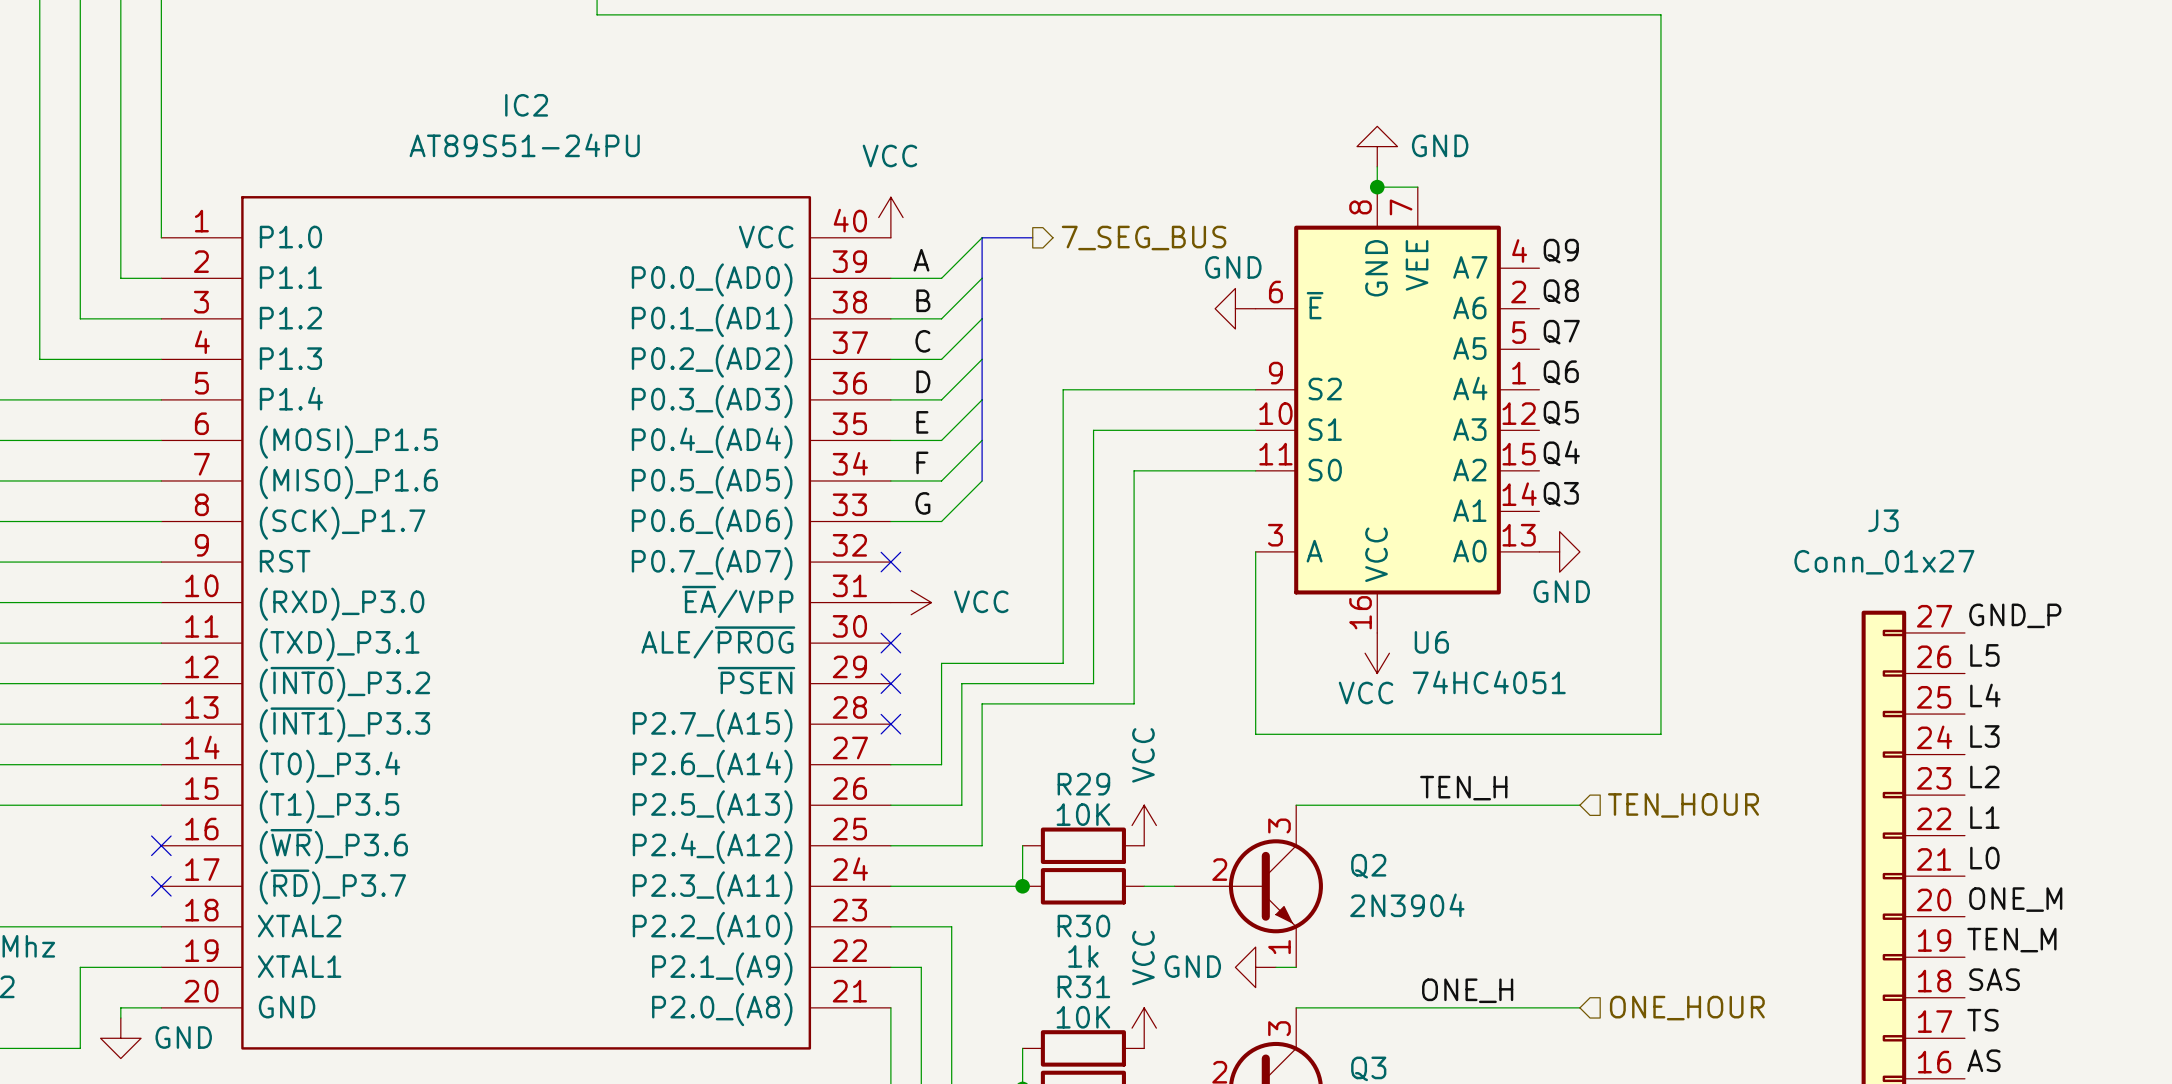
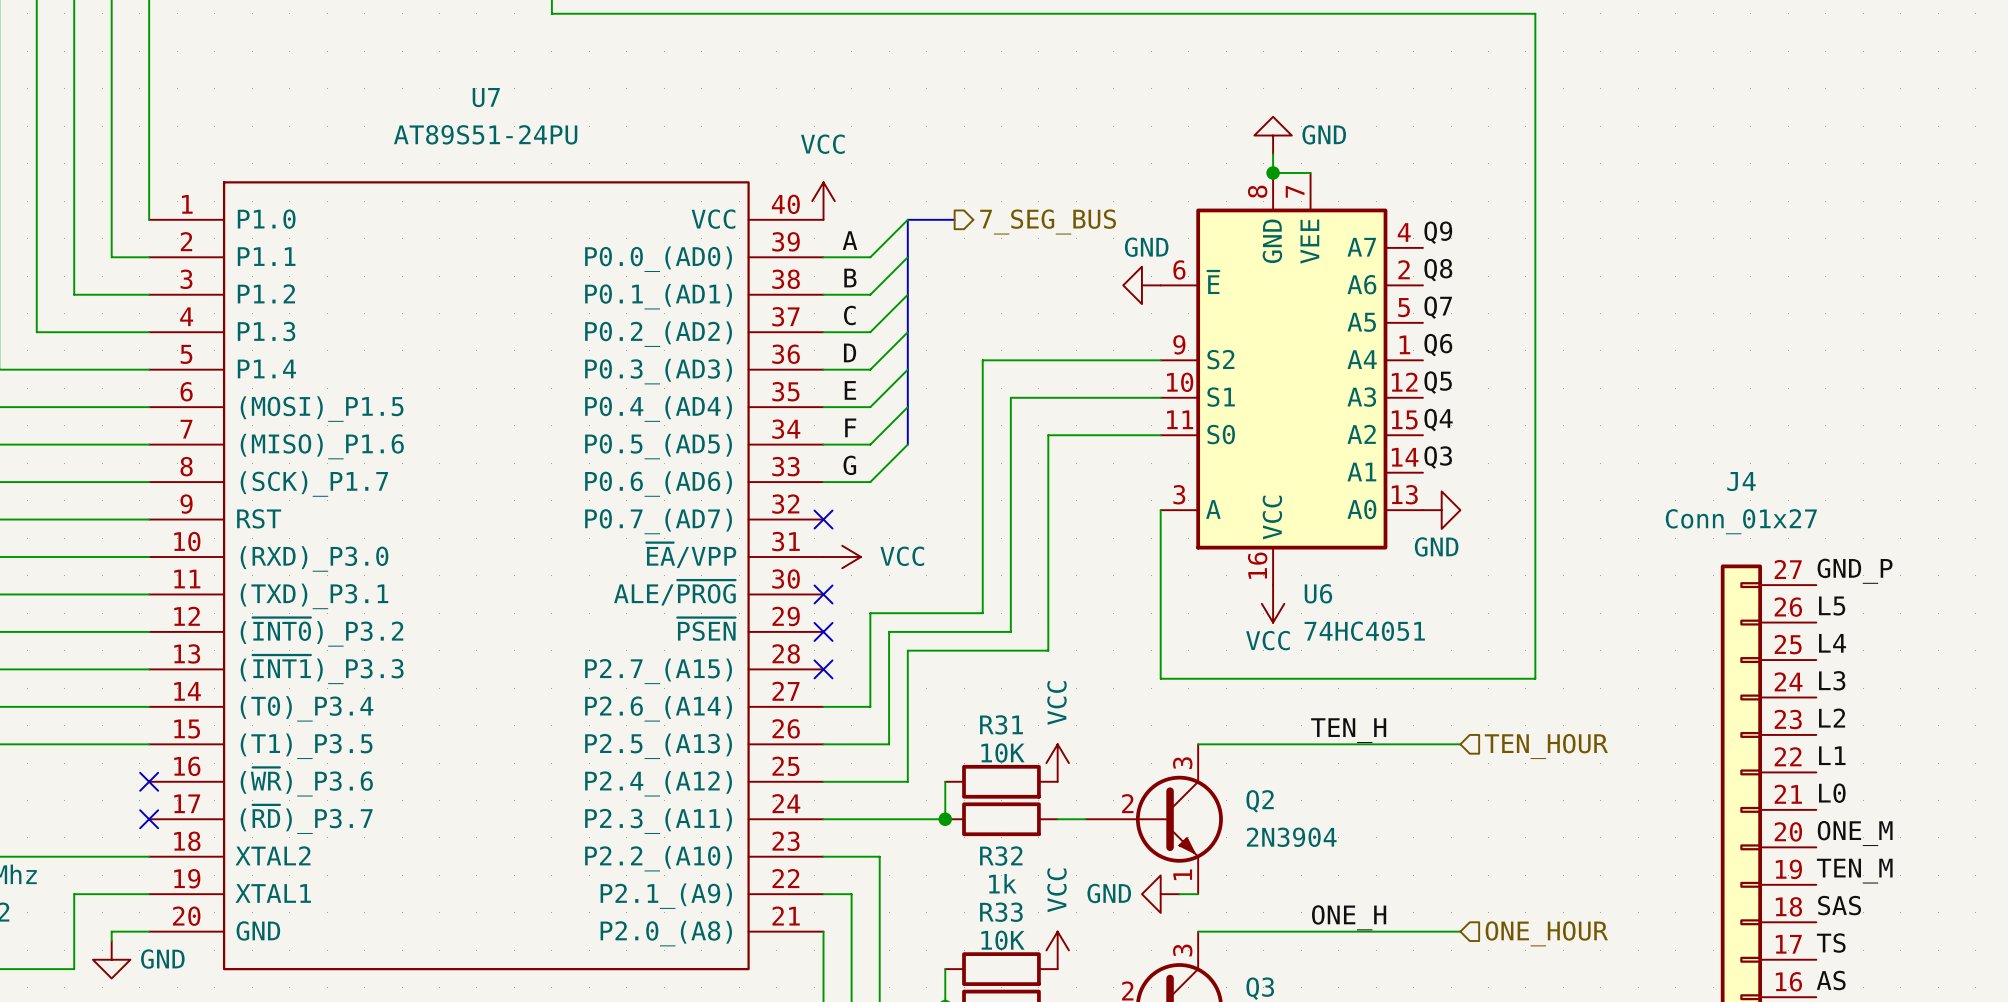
IC2 name: IC2 (526, 105) -> U7 (486, 97)
J3 name: J3 (1883, 520) -> J4 (1741, 481)
R29 name: R29 (1083, 784) -> R31 (1001, 724)
R30 name: R30 (1083, 926) -> R32 (1001, 856)
R31 name: R31 (1083, 986) -> R33 (1001, 912)

